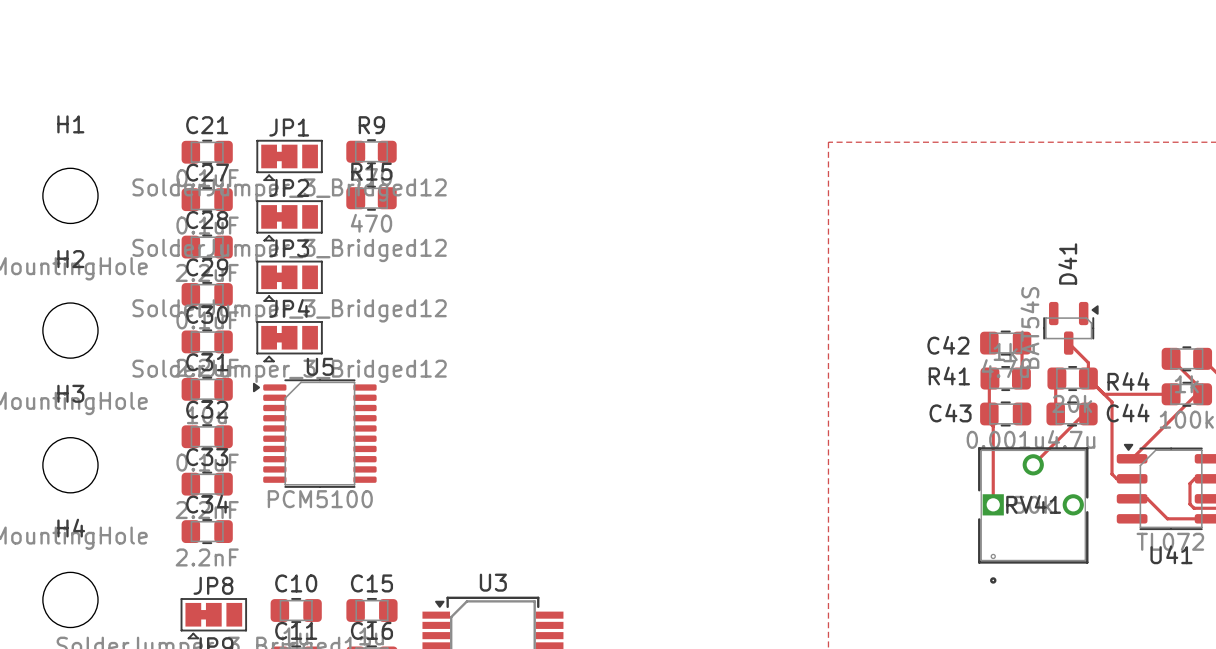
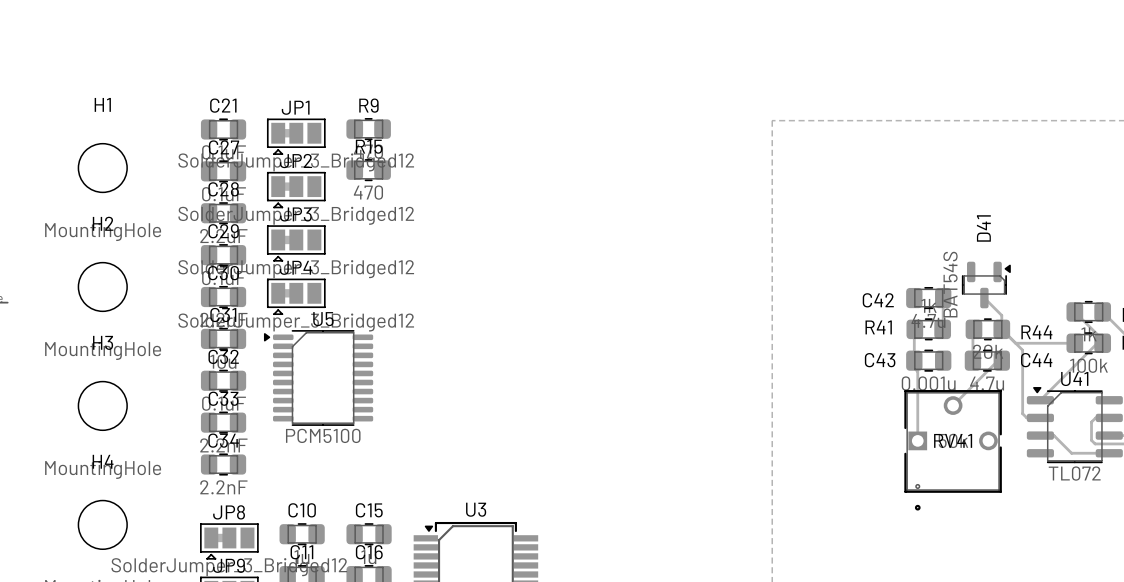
U41 name position: U41 (1171, 554) -> U41 (1074, 379)

